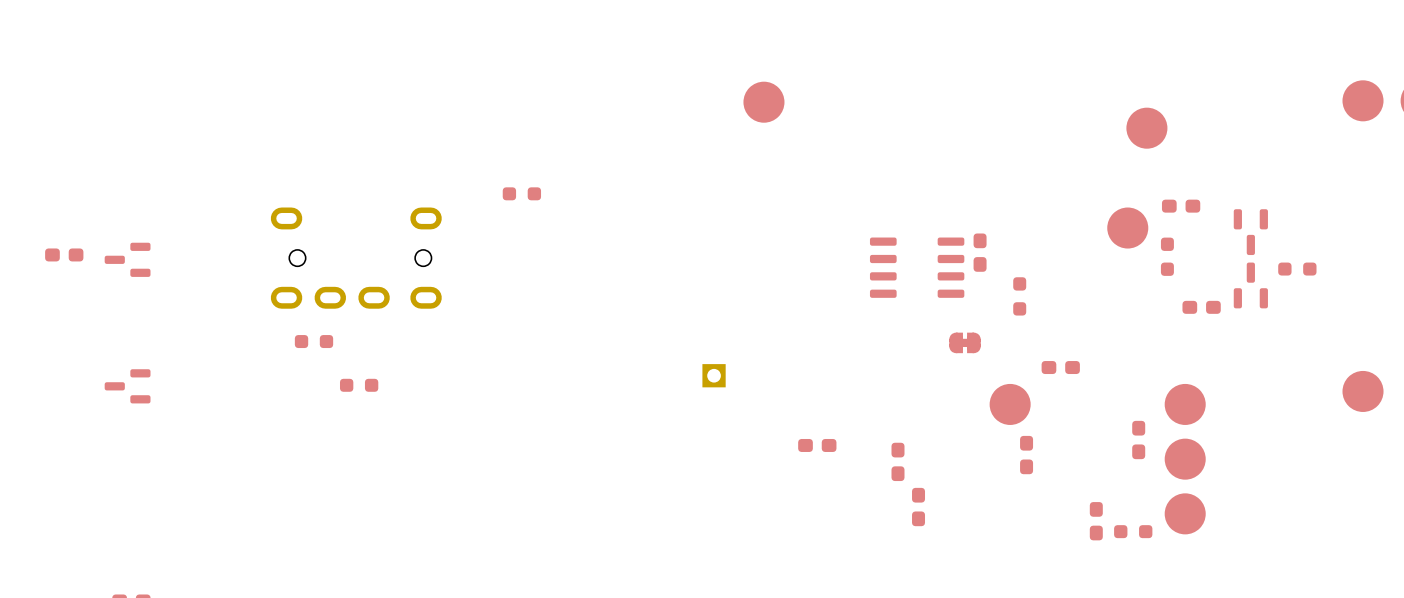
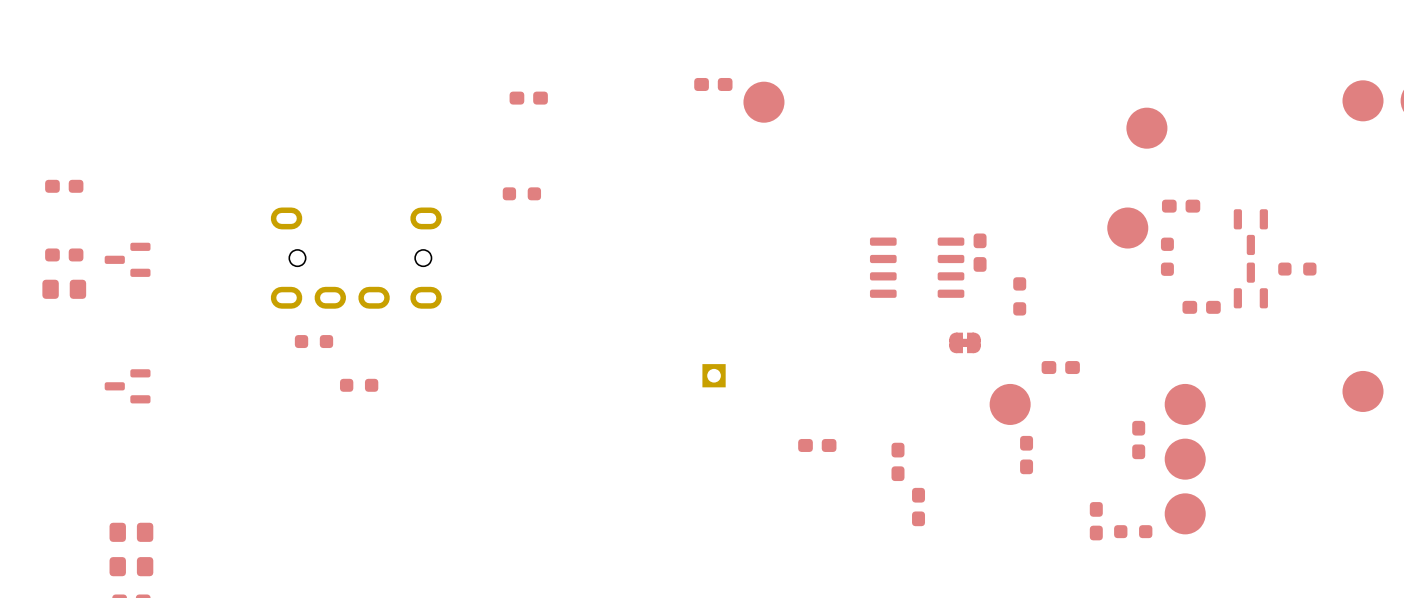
part: none -> (713, 84)
part: none -> (528, 98)
part: none -> (64, 186)
part: none -> (64, 289)
part: none -> (131, 532)
part: none -> (131, 566)

